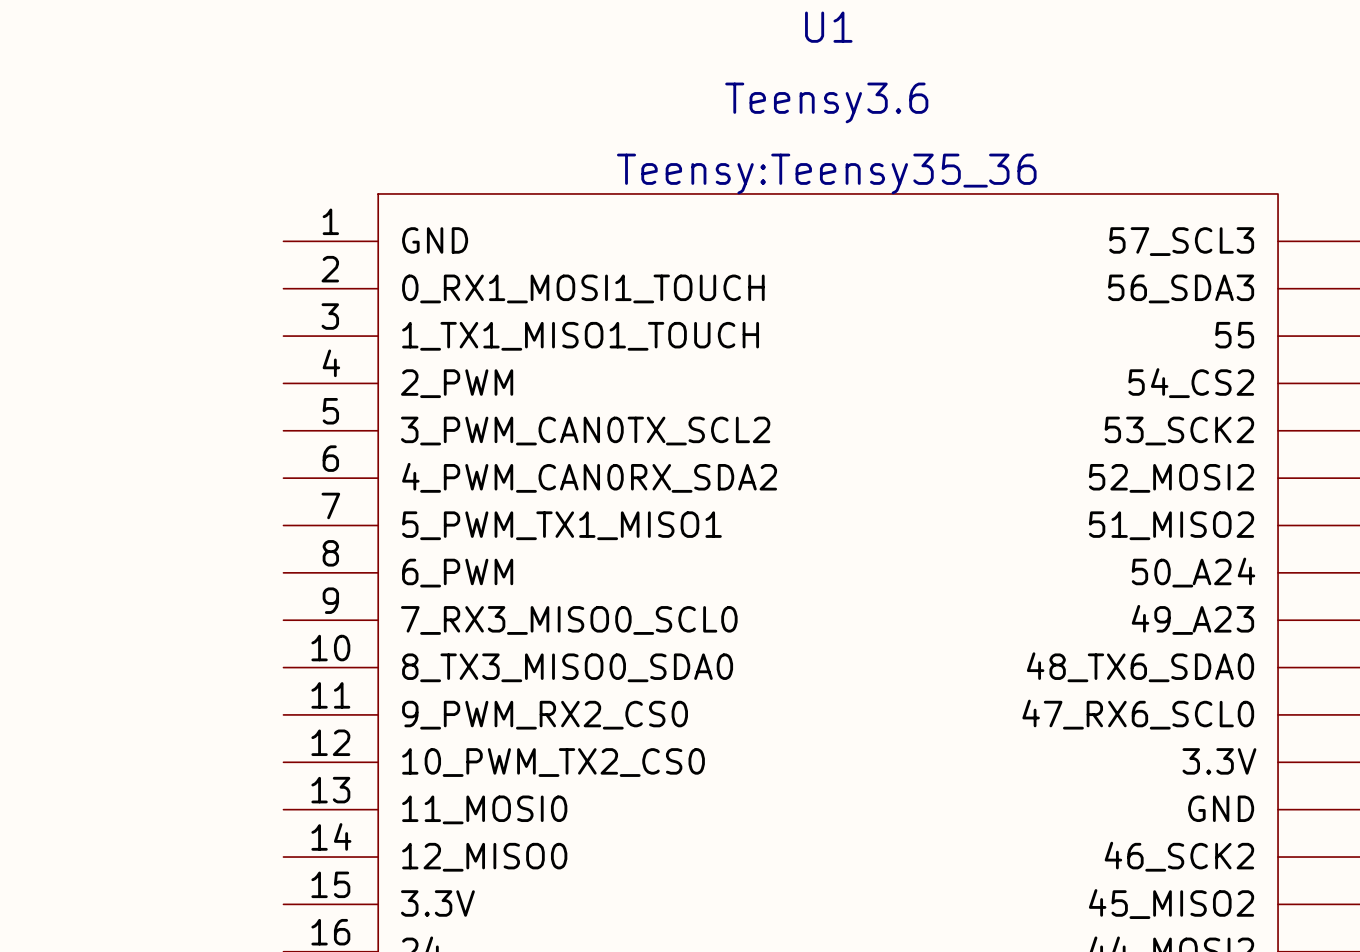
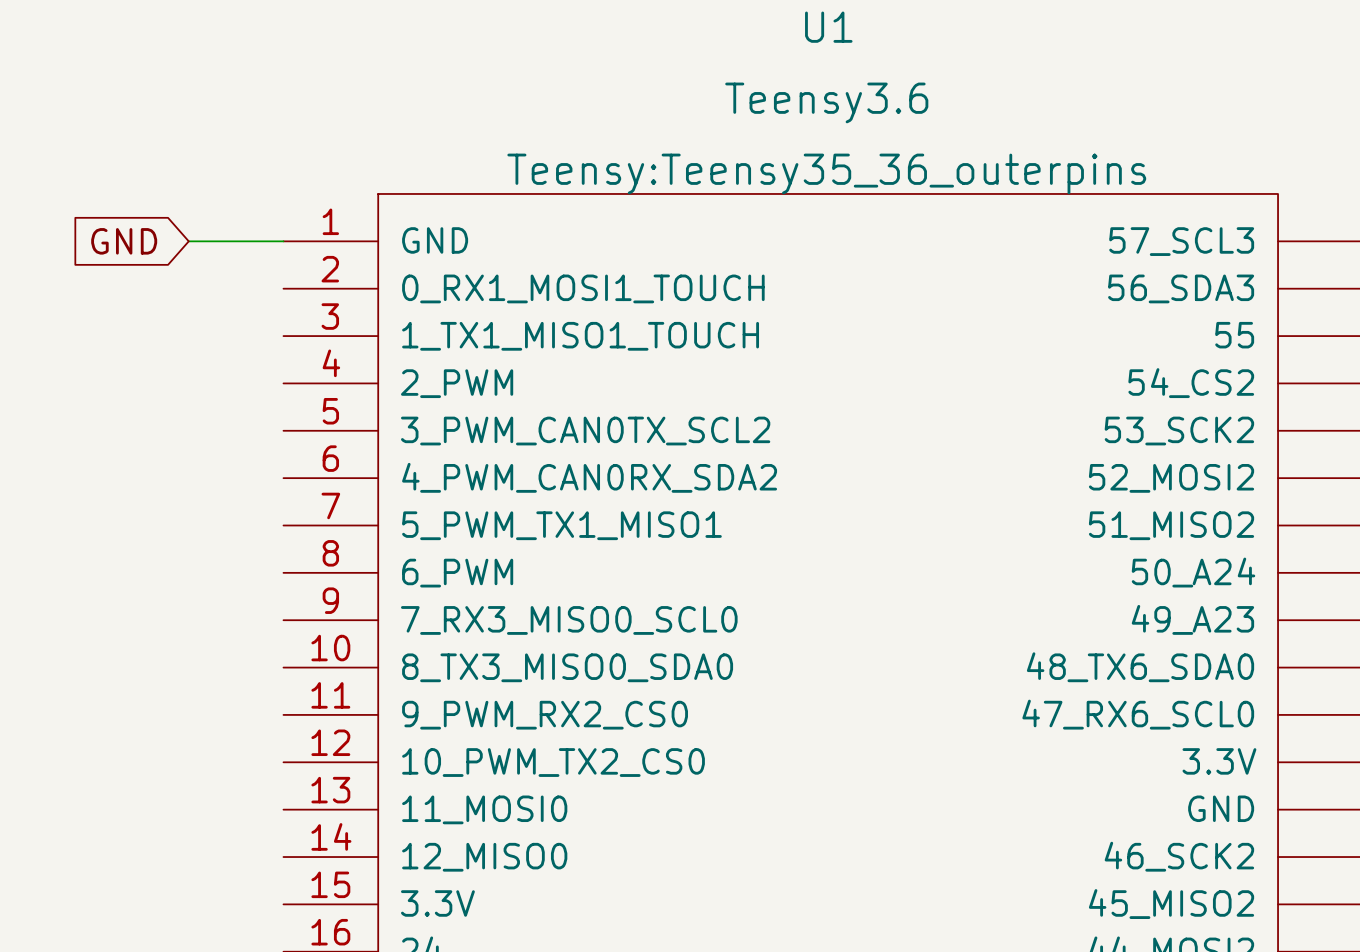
U1 text: Teensy:Teensy35_36 (826, 173) -> Teensy:Teensy35_36_outerpins (826, 173)
global label: none -> GND (124, 241)
wire: none -> (188, 241) (283, 241)

